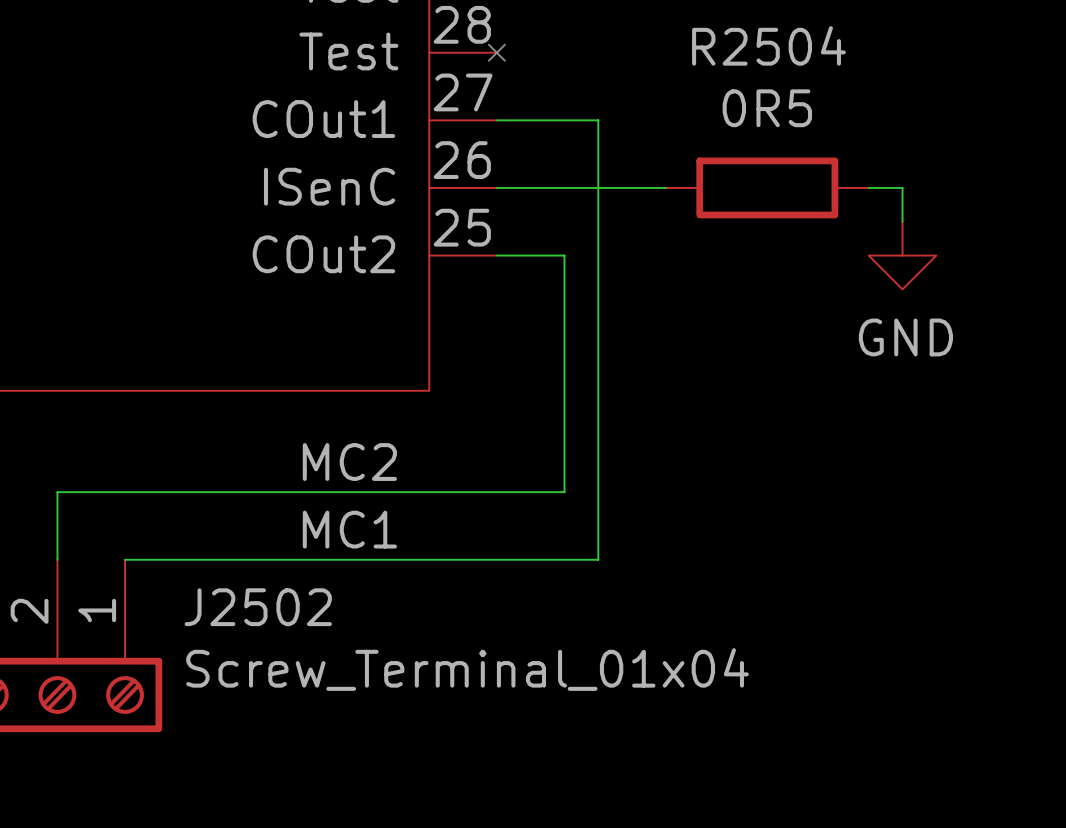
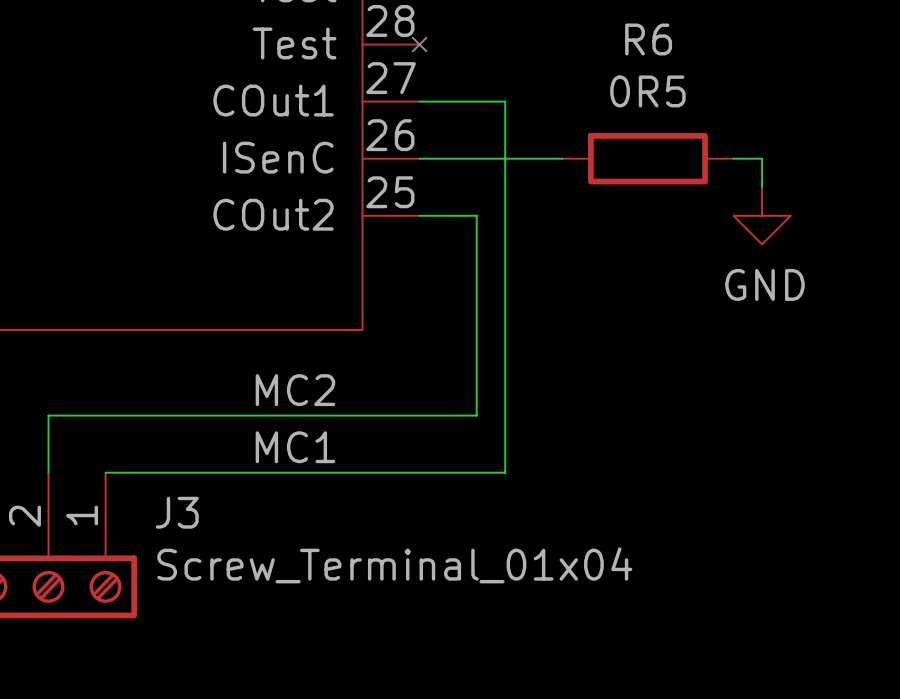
R2504 name: R2504 (768, 45) -> R6 (648, 39)
J2502 name: J2502 (258, 607) -> J3 (177, 512)

